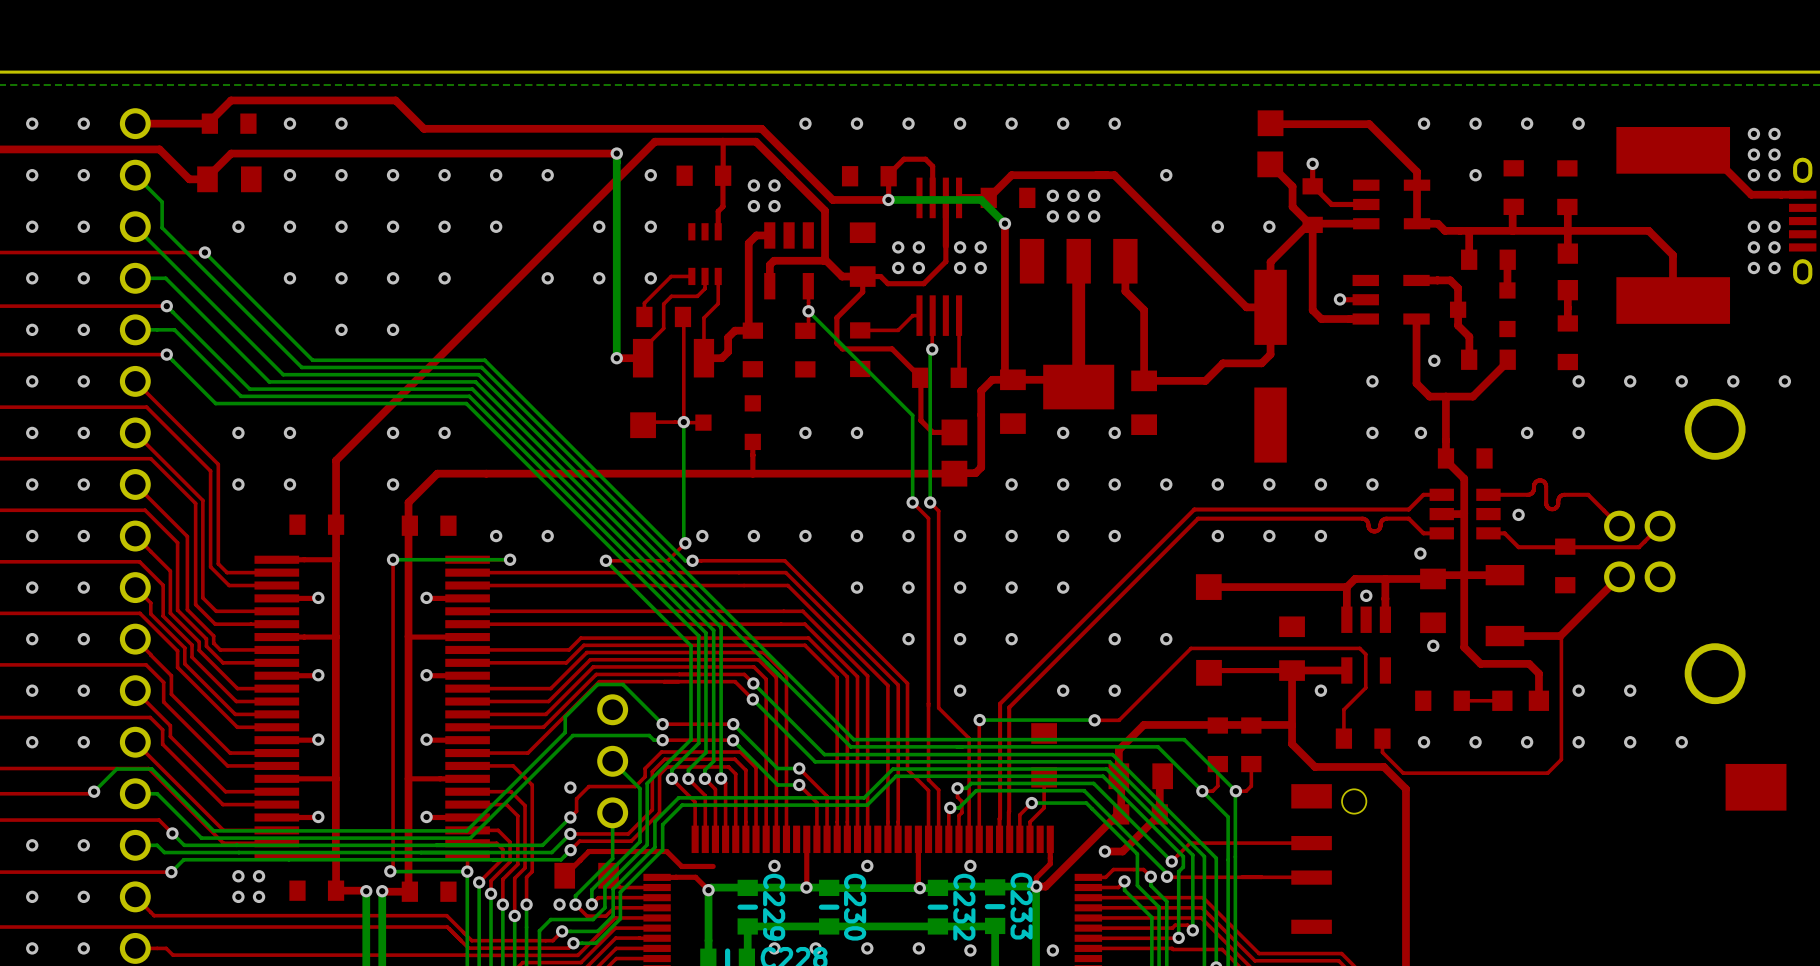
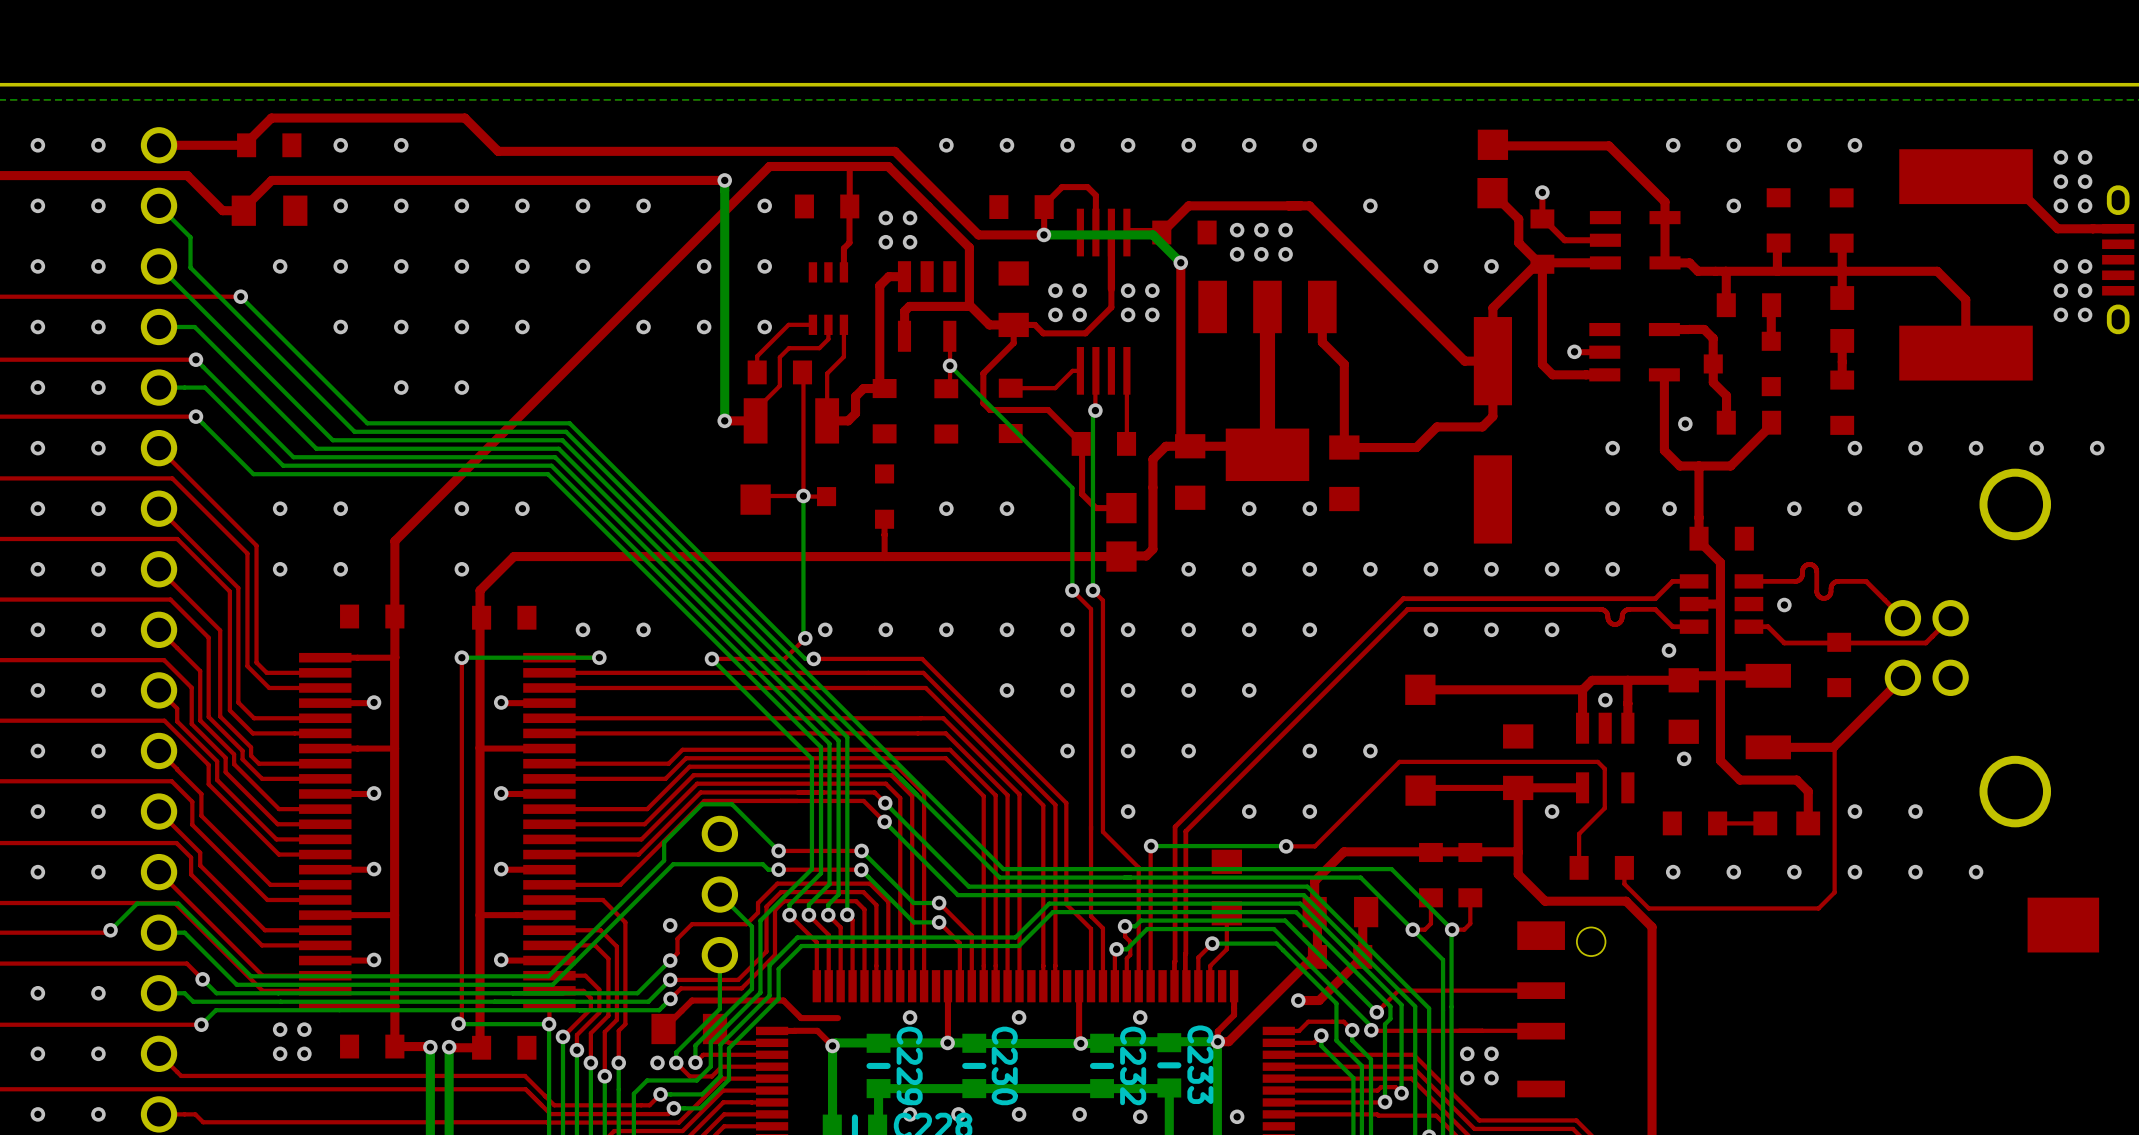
via: none -> (1467, 1053)
via: none -> (1491, 1053)
via: none -> (1467, 1078)
via: none -> (1491, 1078)

